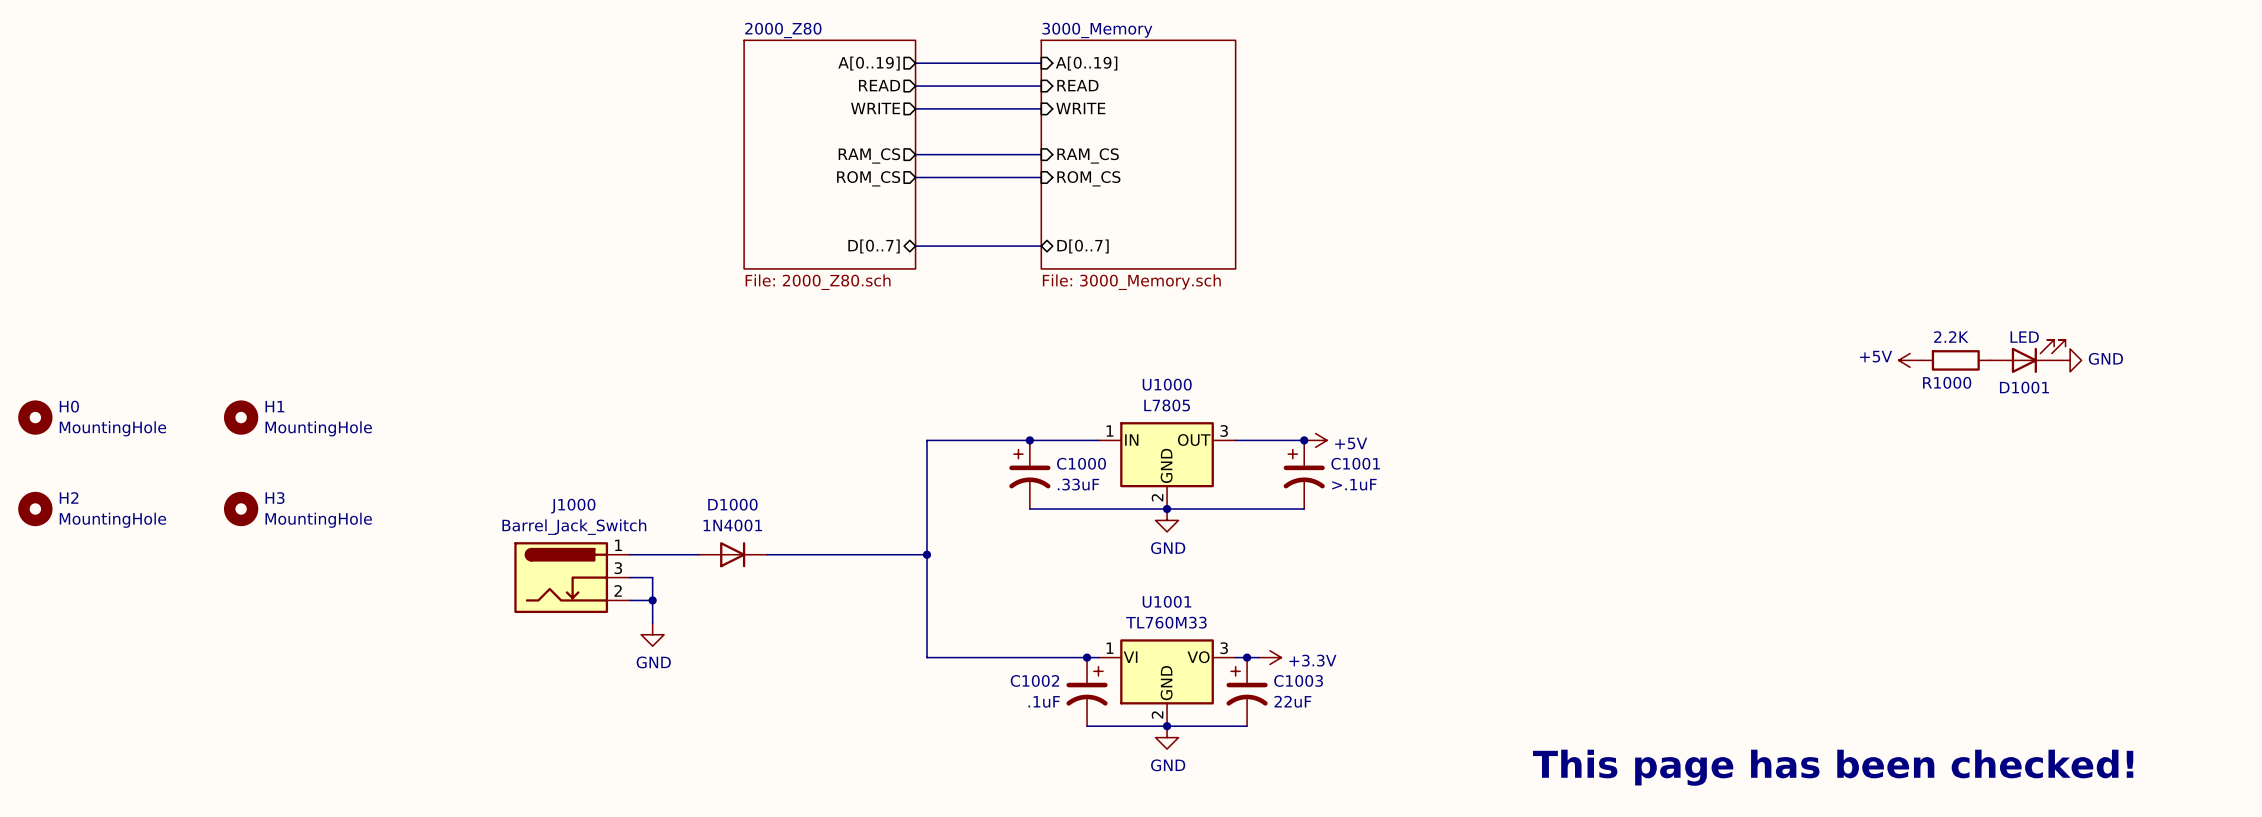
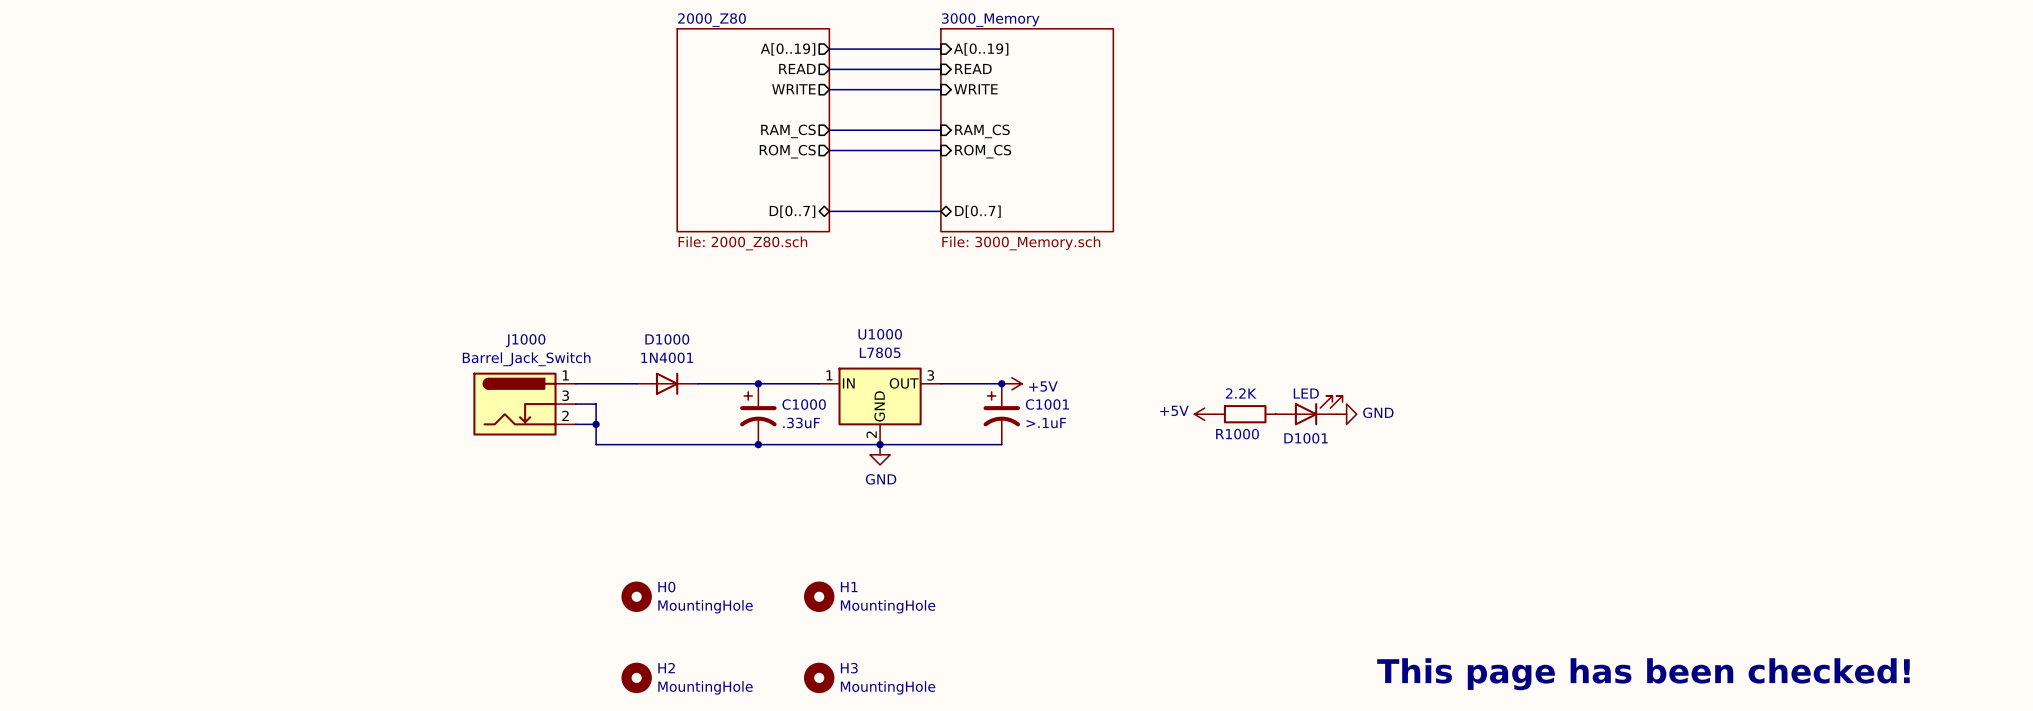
D1001 position: (2027, 356) -> (1309, 410)
power symbol: +5V (1910, 360) -> none
R1000 position: (1955, 360) -> (1245, 414)
power symbol: GND (2070, 360) -> none
H0 position: (35, 417) -> (636, 596)
H1 position: (241, 417) -> (819, 596)
wire: none -> (697, 383) (819, 383)
junction: none -> (758, 383)
junction: (1029, 440) -> none
wire: (1041, 440) (926, 440) (926, 657) (1098, 657) -> none
junction: none -> (1001, 383)
power symbol: none -> +5V (1011, 383)
wire: (1235, 440) (1304, 440) -> none
junction: (1304, 440) -> none
power symbol rotation: 0° (1315, 440) -> 180° (1204, 414)
power symbol position: +5V (1315, 440) -> +5V (1204, 414)
wire: none -> (575, 404) (596, 404) (596, 444) (930, 444)
U1000 position: (1167, 465) -> (880, 406)
C1000 position: (1029, 474) -> (758, 414)
C1001 position: (1304, 474) -> (1001, 414)
power symbol: none -> GND (1346, 414)
junction: none -> (596, 424)
H2 position: (35, 509) -> (636, 677)
H3 position: (241, 509) -> (819, 677)
junction: none -> (758, 444)
junction: none -> (880, 444)
wire: (1109, 509) (1304, 509) -> none
junction: (1167, 509) -> none
power symbol: none -> GND (880, 454)
power symbol: GND (1167, 520) -> none
wire: (629, 554) (698, 554) -> (575, 383) (636, 383)
D1000 position: (732, 554) -> (667, 383)
wire: (766, 554) (926, 554) -> none
junction: (926, 554) -> none
J1000 position: (572, 577) -> (524, 404)
wire: (629, 577) (652, 577) (652, 623) -> none
wire: (629, 600) (652, 600) -> (575, 424) (596, 424)
junction: (652, 600) -> none
power symbol: GND (652, 634) -> none
junction: (1087, 657) -> none
wire: (1235, 657) (1258, 657) -> none
junction: (1247, 657) -> none
power symbol: +3.3V (1269, 657) -> none
U1001: TL760M33 (1167, 682) -> none
C1002: .1uF (1087, 691) -> none
C1003: 22uF (1247, 691) -> none
wire: (1087, 726) (1247, 726) -> none
junction: (1167, 726) -> none
power symbol: GND (1167, 737) -> none

